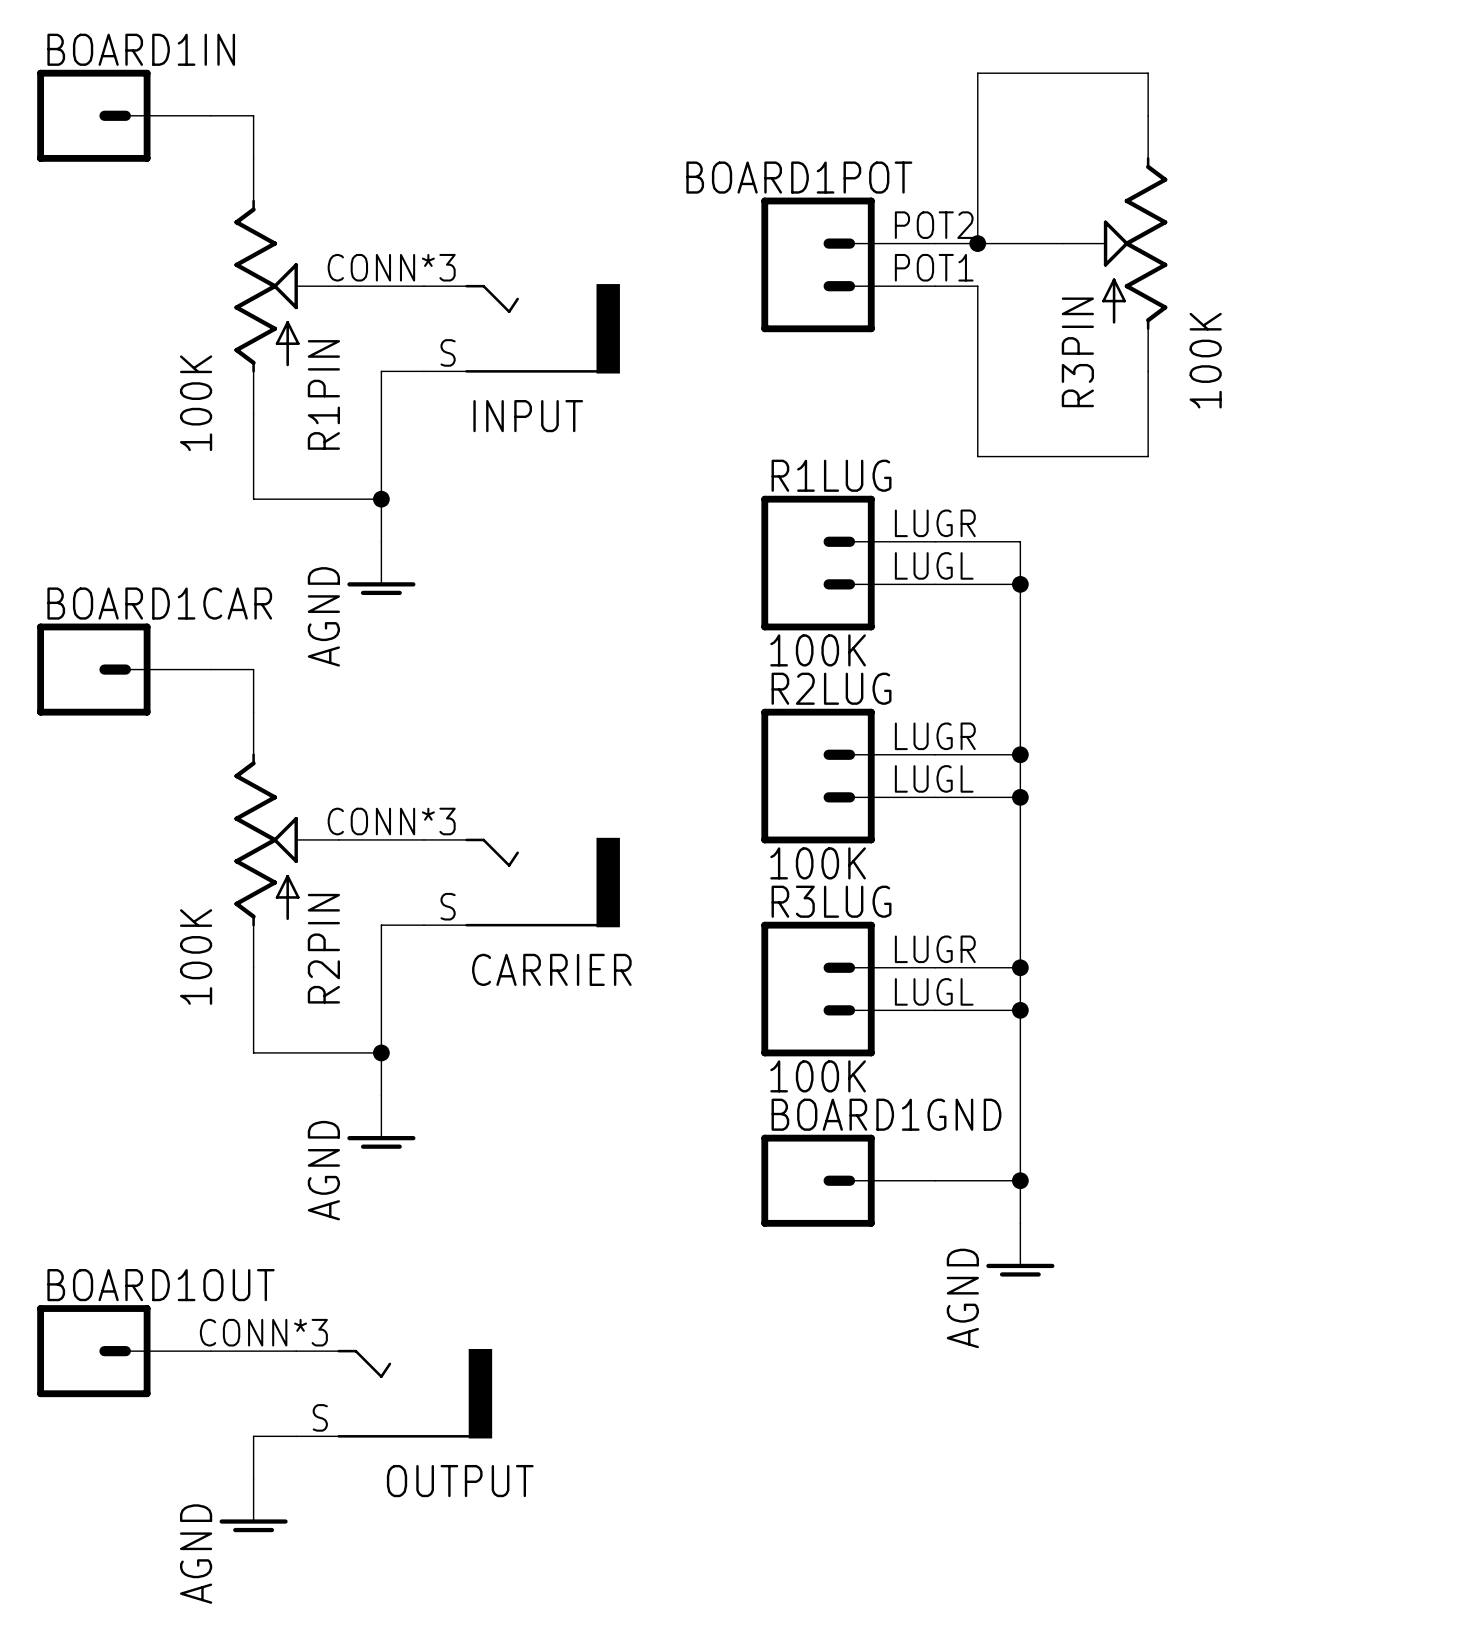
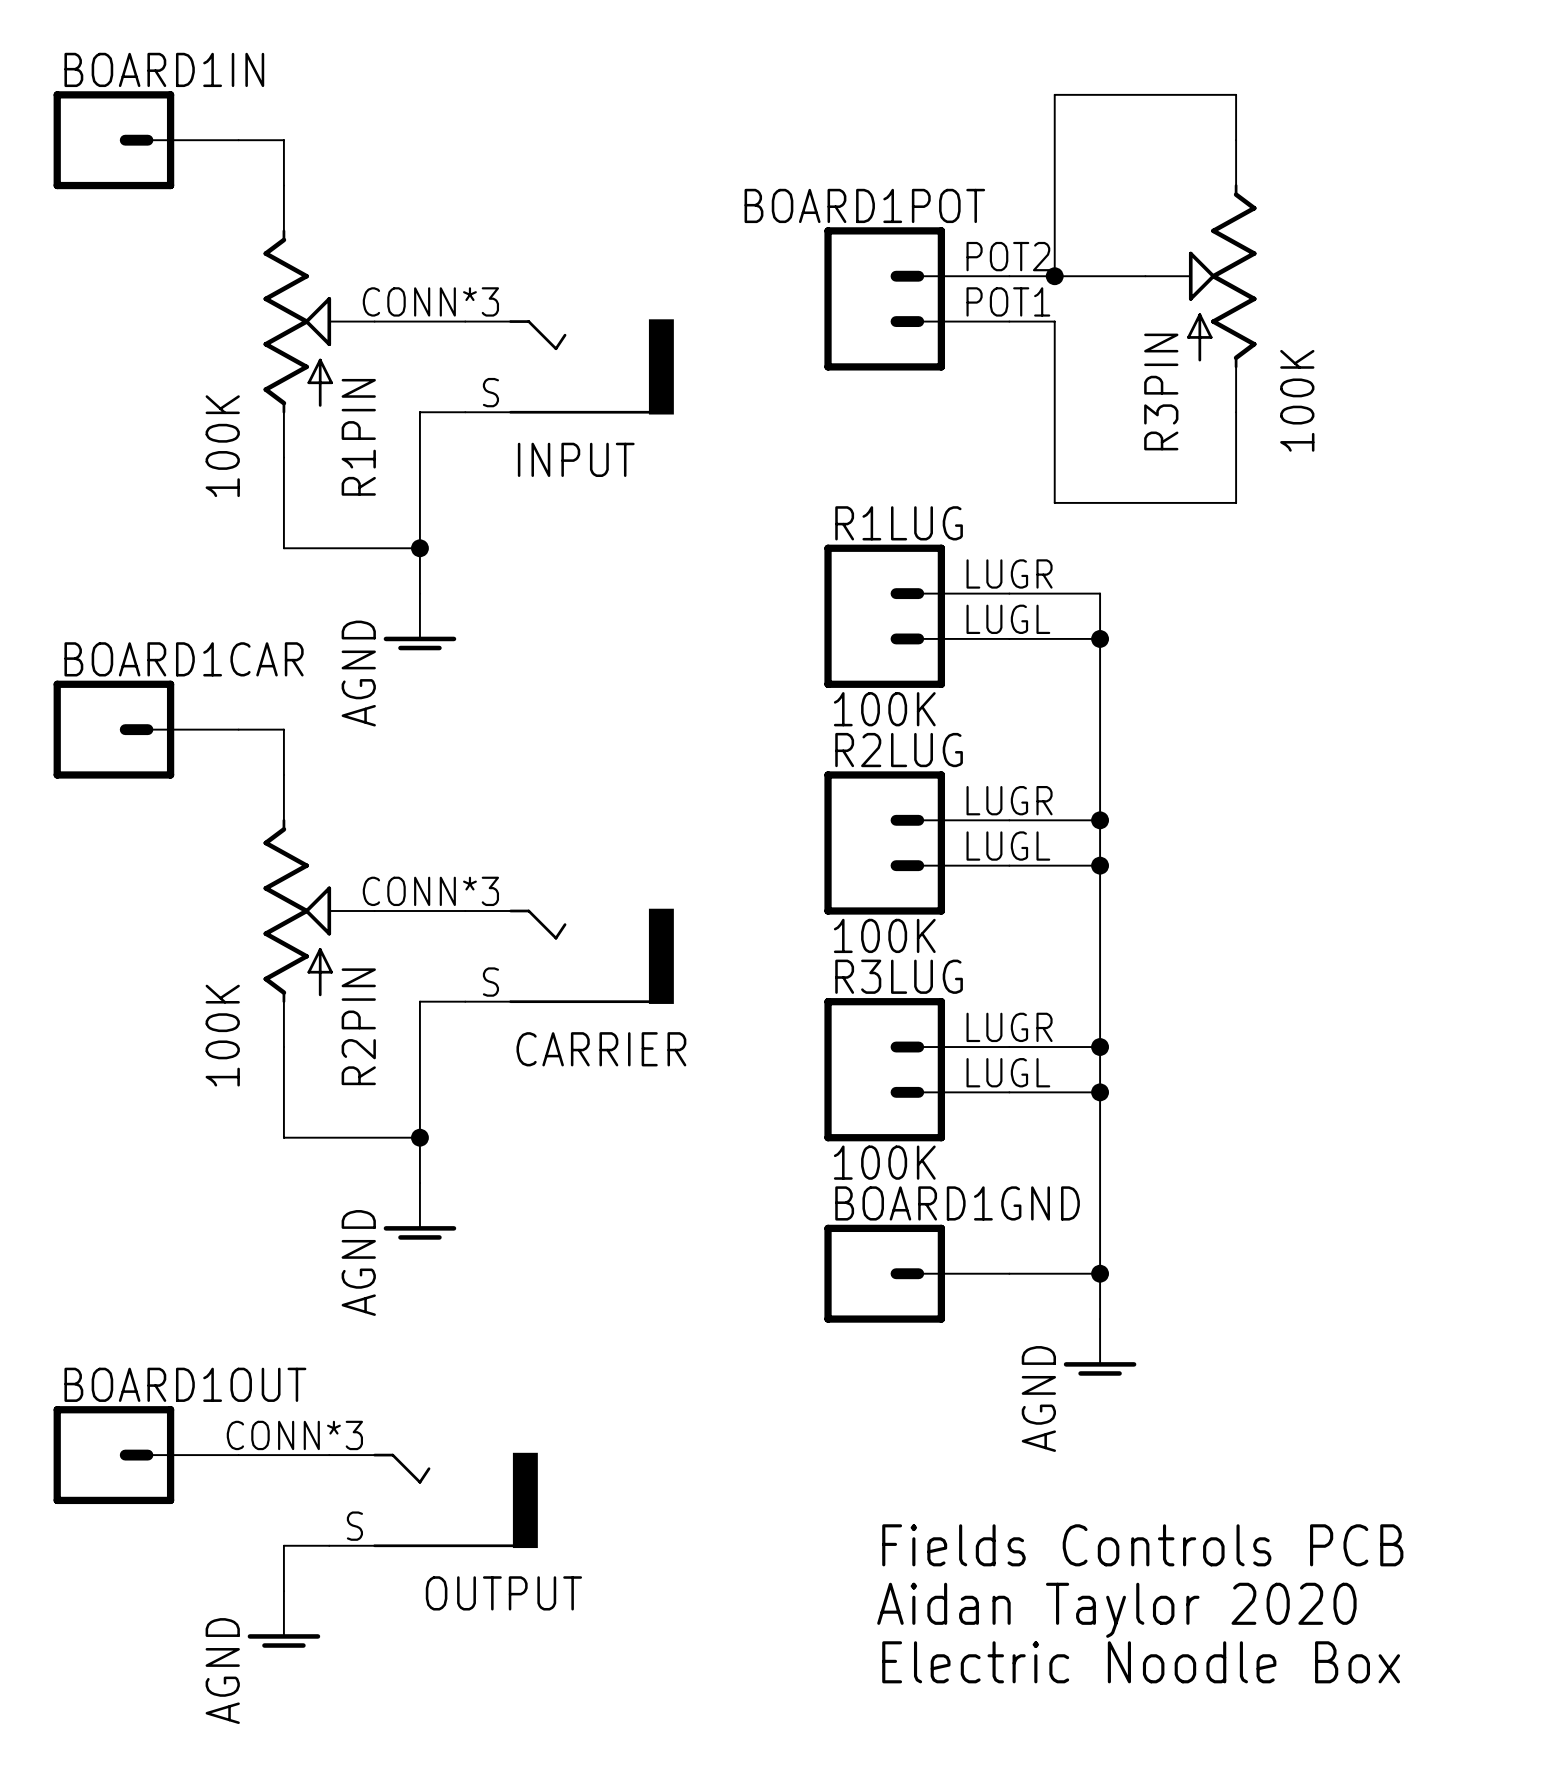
text: none -> Fields Controls PCB (1142, 1545)
text: none -> Aidan Taylor 2020 (1116, 1610)
text: none -> Electric Noodle Box (1141, 1662)

